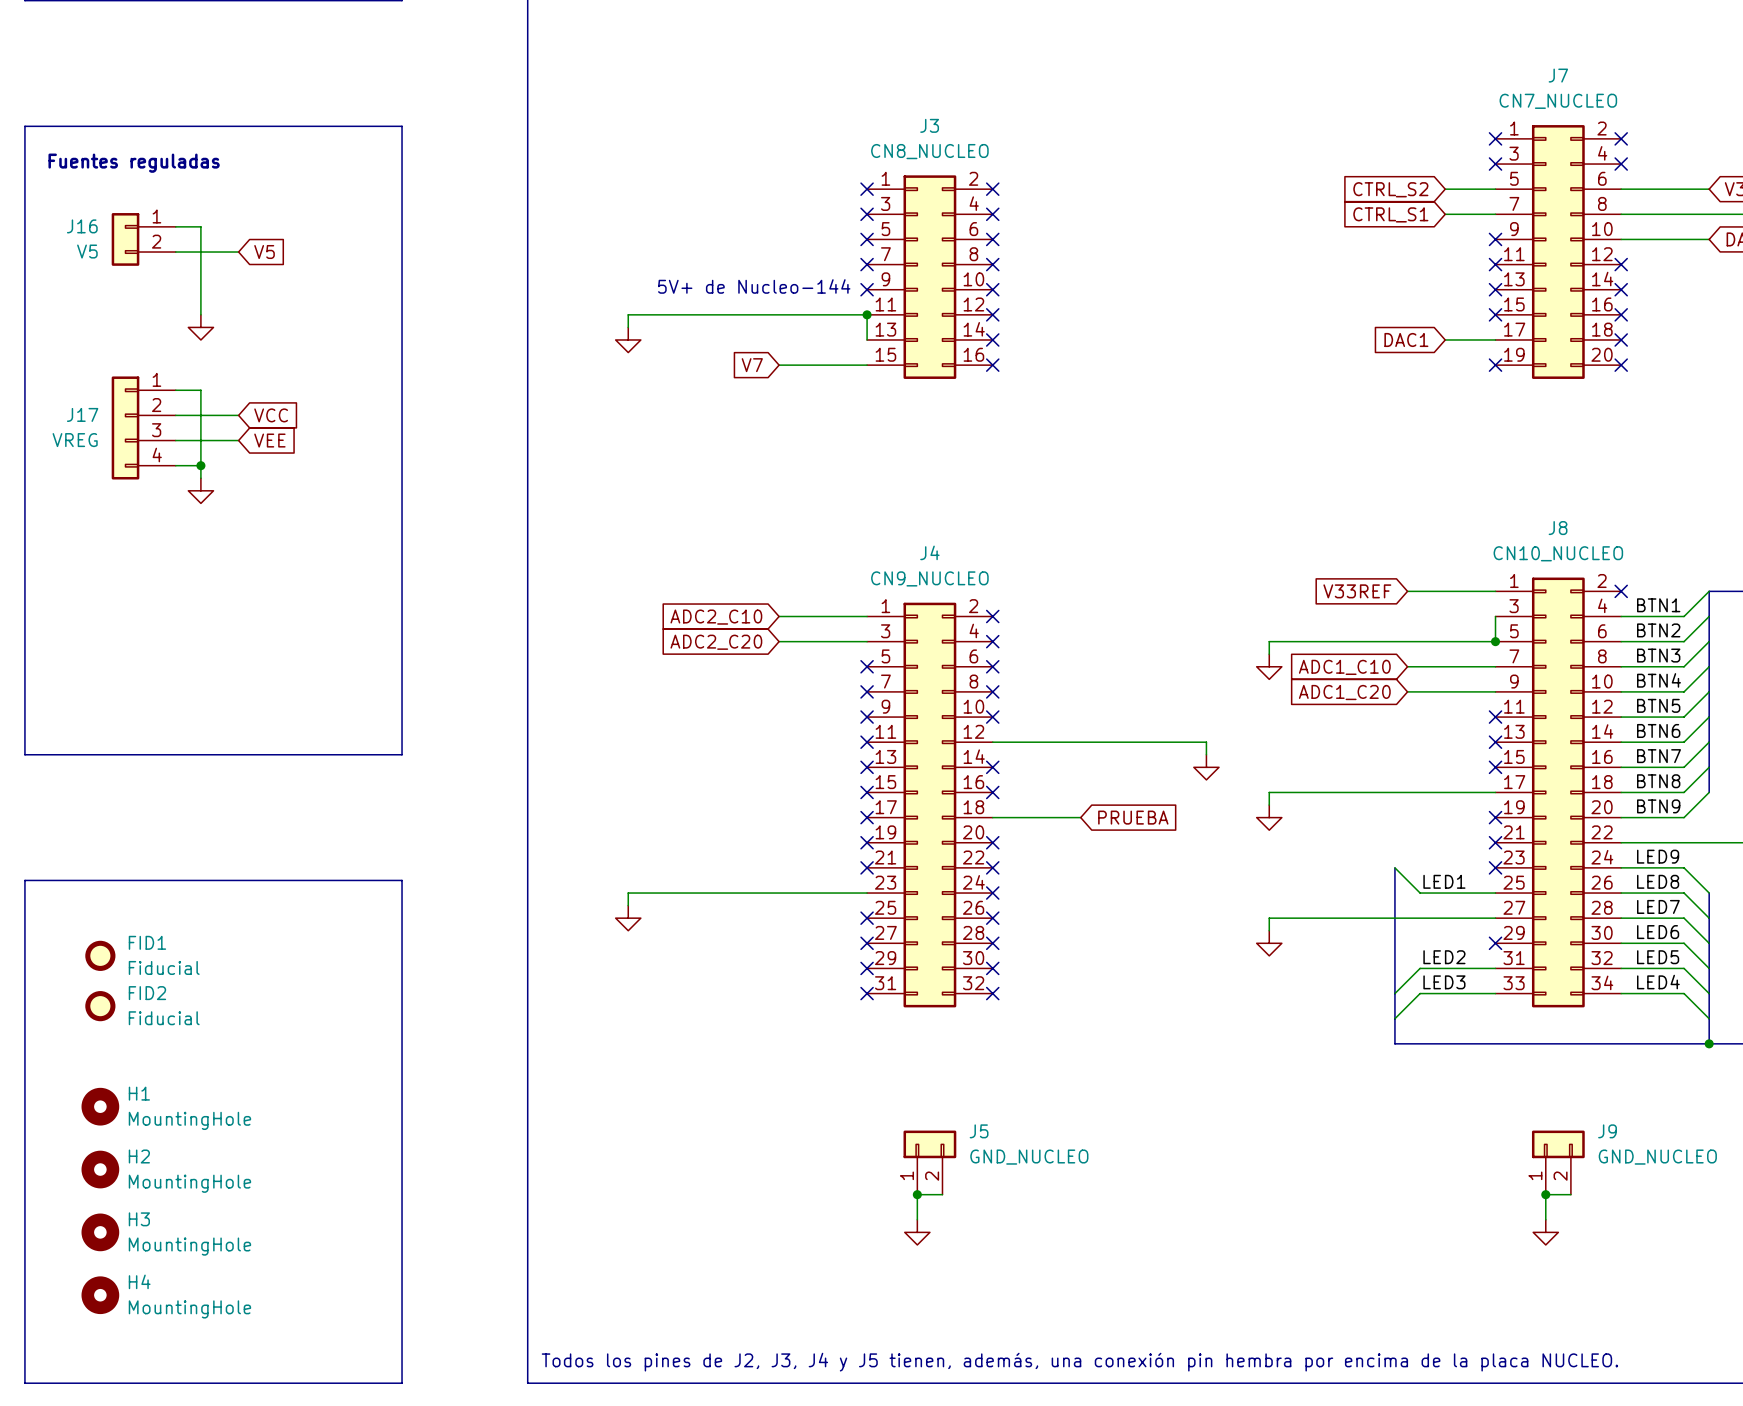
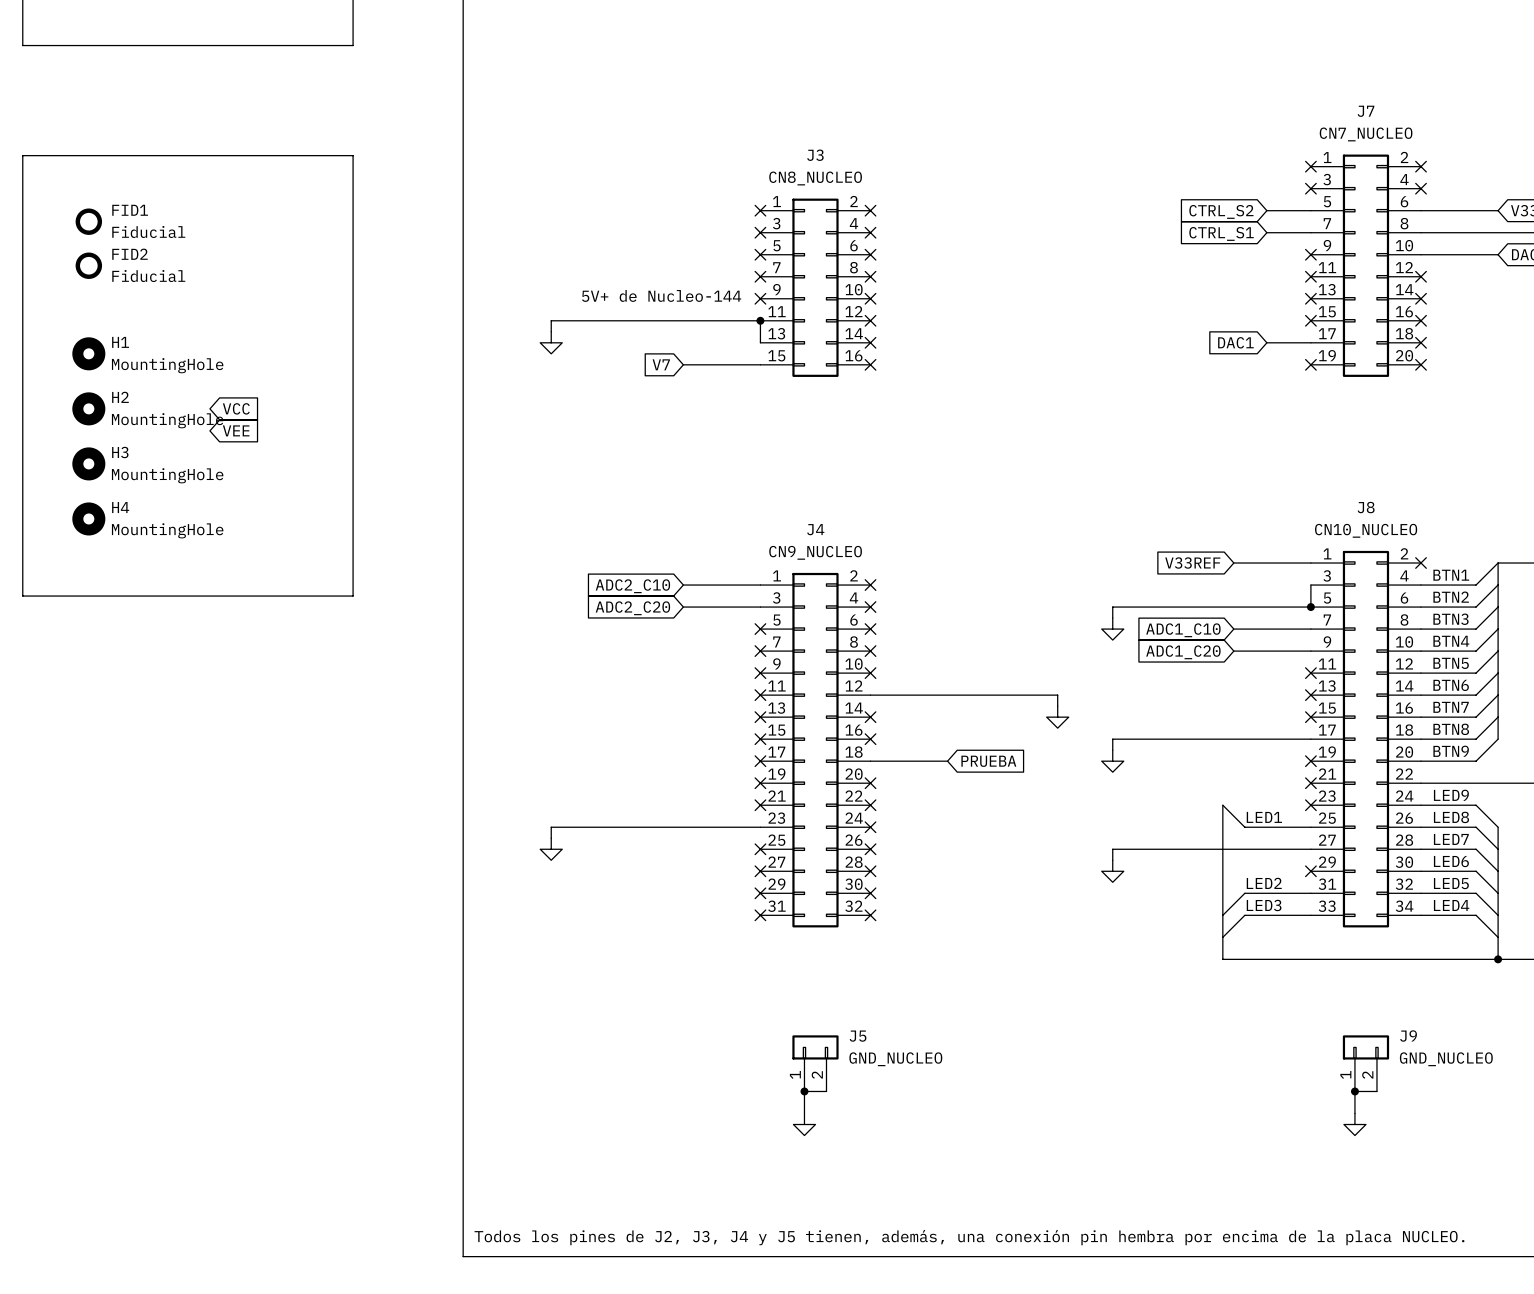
text: Fuentes reguladas (134, 163) -> none
wire: (175, 226) (200, 226) (200, 314) -> none
J16: V5 (143, 239) -> none
wire: (175, 252) (238, 252) -> none
global label: V5 (264, 252) -> none
power symbol: (200, 327) -> none
wire: (175, 390) (200, 390) (200, 478) -> none
wire: (175, 415) (238, 415) -> none
J17: VREG (143, 427) -> none
wire: (175, 440) (238, 440) -> none
wire: (175, 465) (200, 465) -> none
junction: (200, 465) -> none
power symbol: (200, 490) -> none
line: (24, 629) (24, 754) (402, 754) (402, 629) -> (22, 596) (353, 596)
line: (24, 880) (402, 880) (402, 1383) (24, 1383) (24, 880) -> none
FID1 position: (100, 955) -> (88, 221)
FID2 position: (100, 1006) -> (88, 265)
H1 position: (100, 1106) -> (88, 353)
H2 position: (100, 1169) -> (88, 408)
H3 position: (100, 1232) -> (88, 463)
H4 position: (100, 1295) -> (88, 518)

